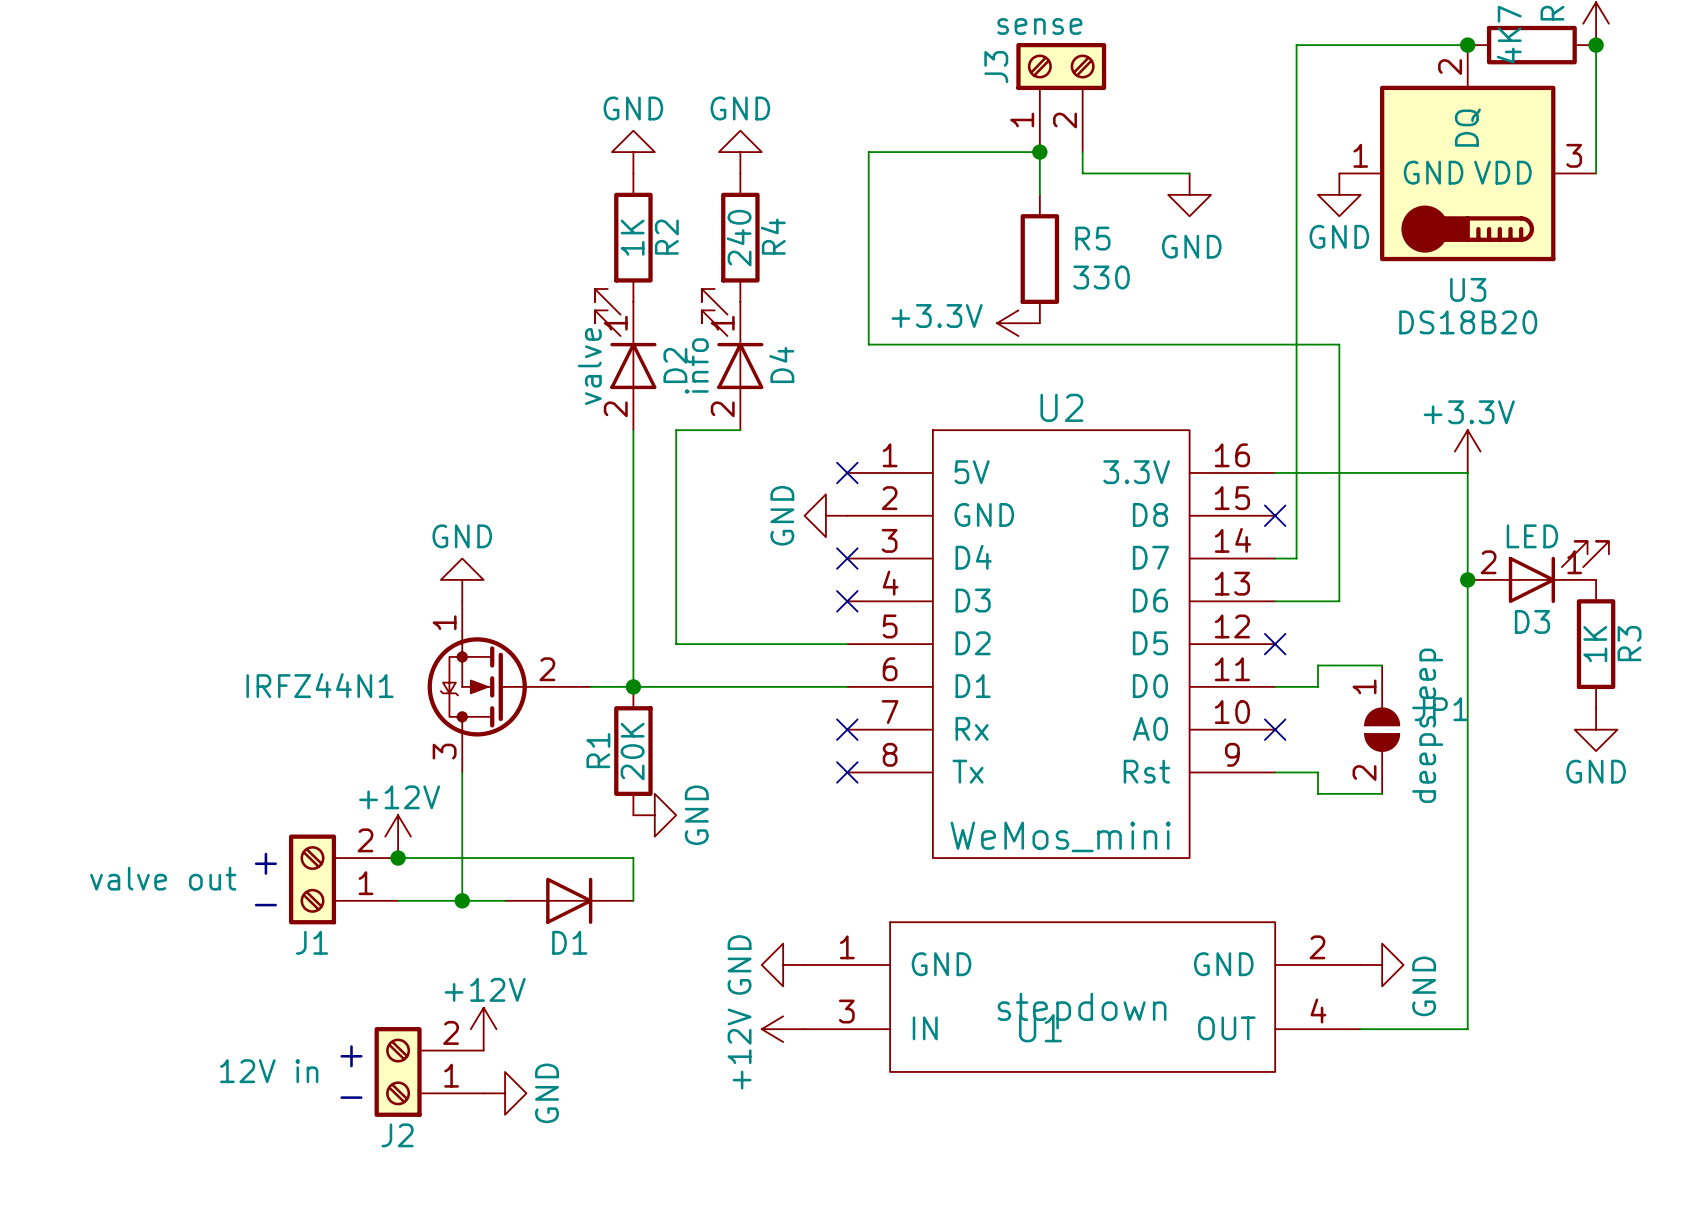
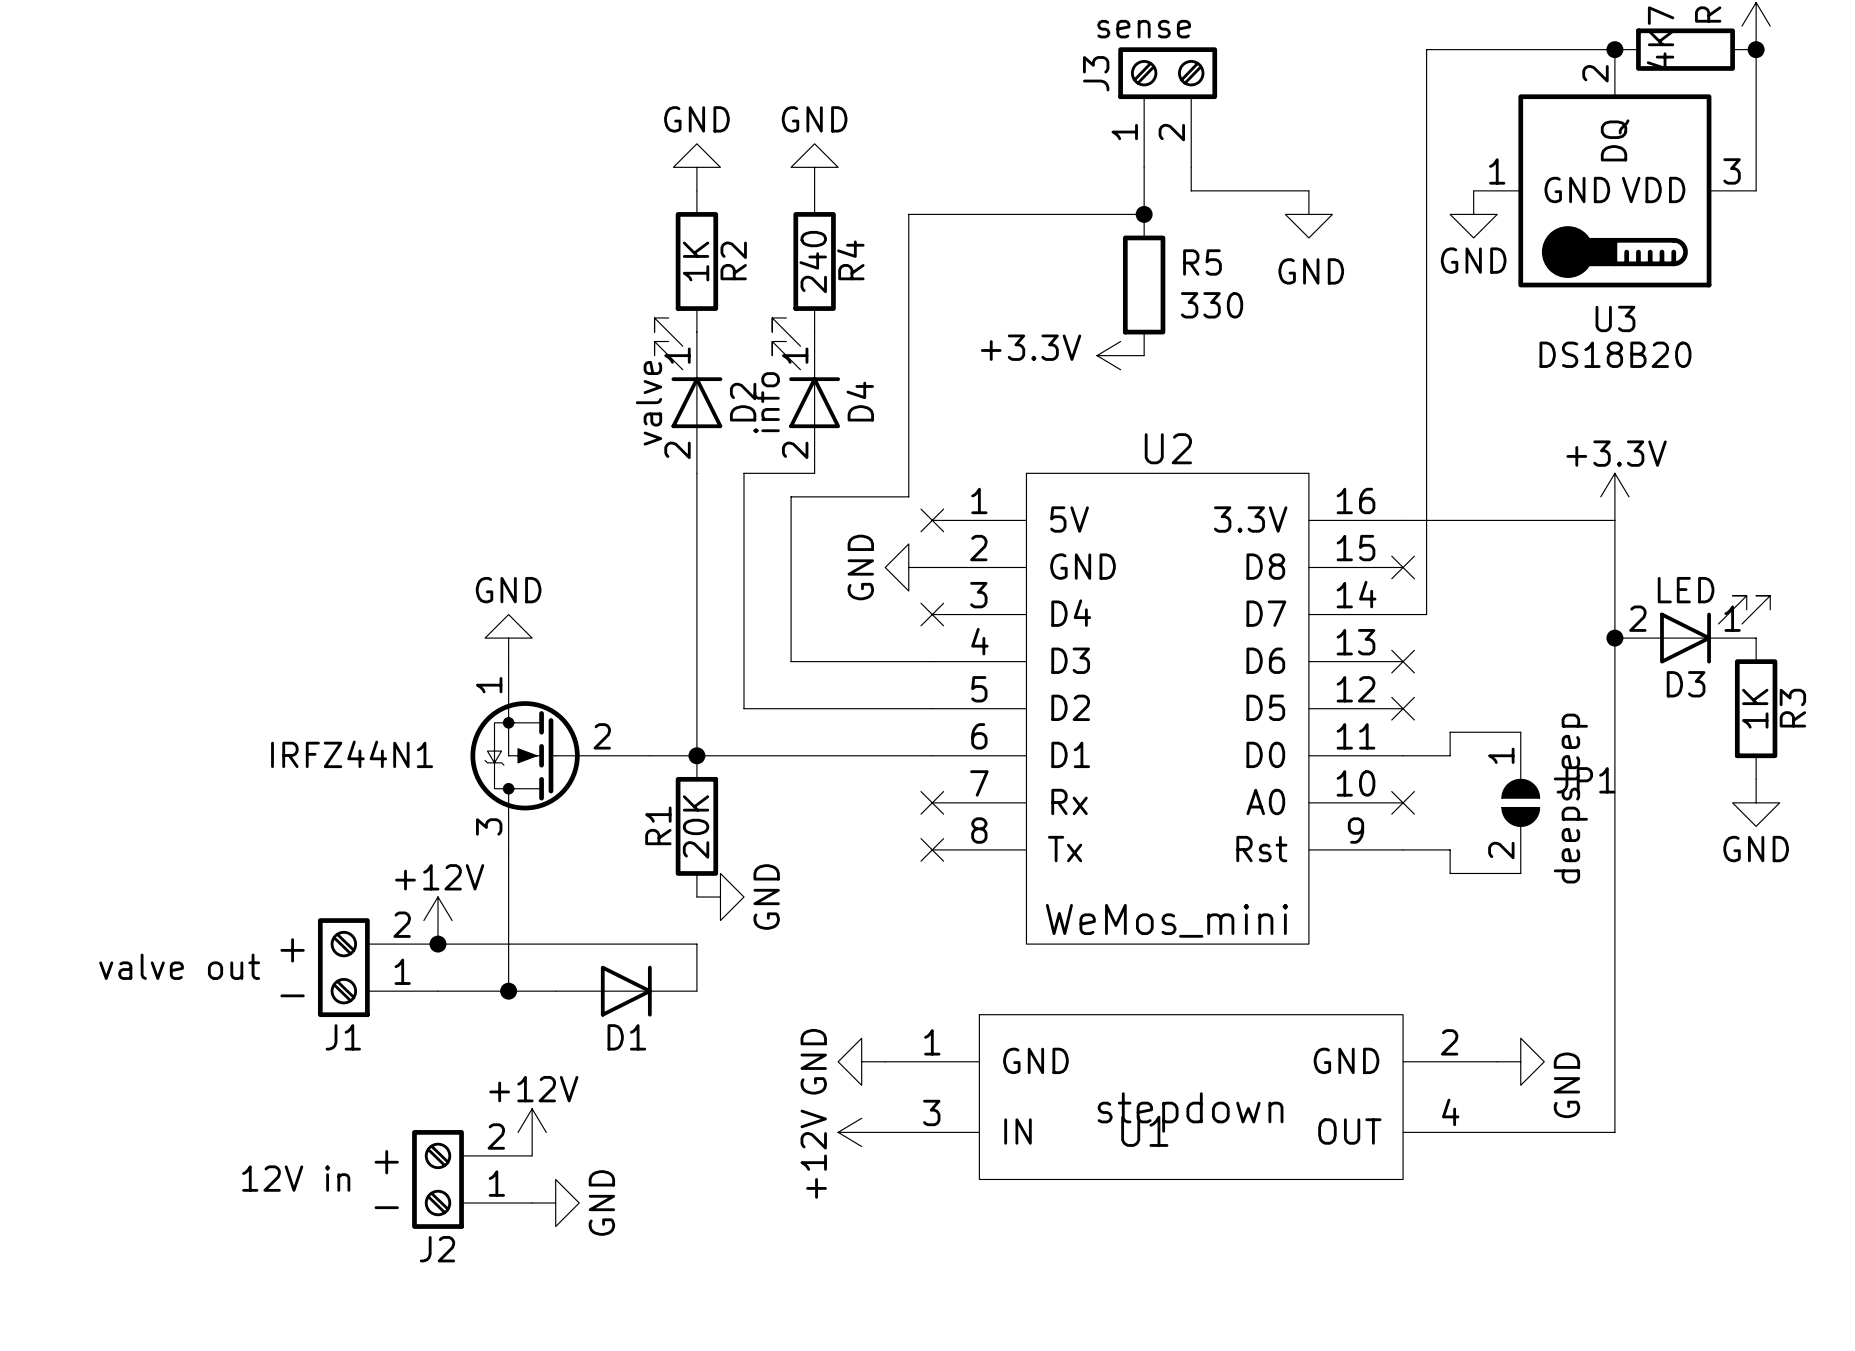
wire: (1039, 152) (868, 152) (868, 344) (1339, 344) (1339, 601) (1275, 601) -> none
junction position: (1039, 152) -> (1144, 214)
wire: none -> (1144, 214) (908, 214) (908, 496) (791, 496) (791, 661) (932, 661)
no-connect mark: (847, 601) -> none
no-connect mark: none -> (1403, 661)

